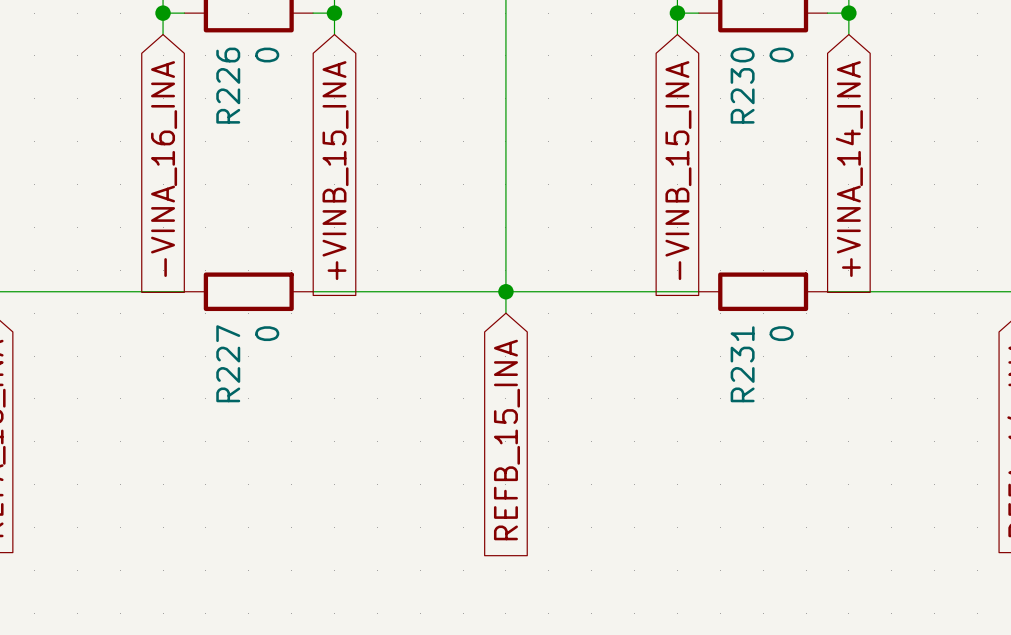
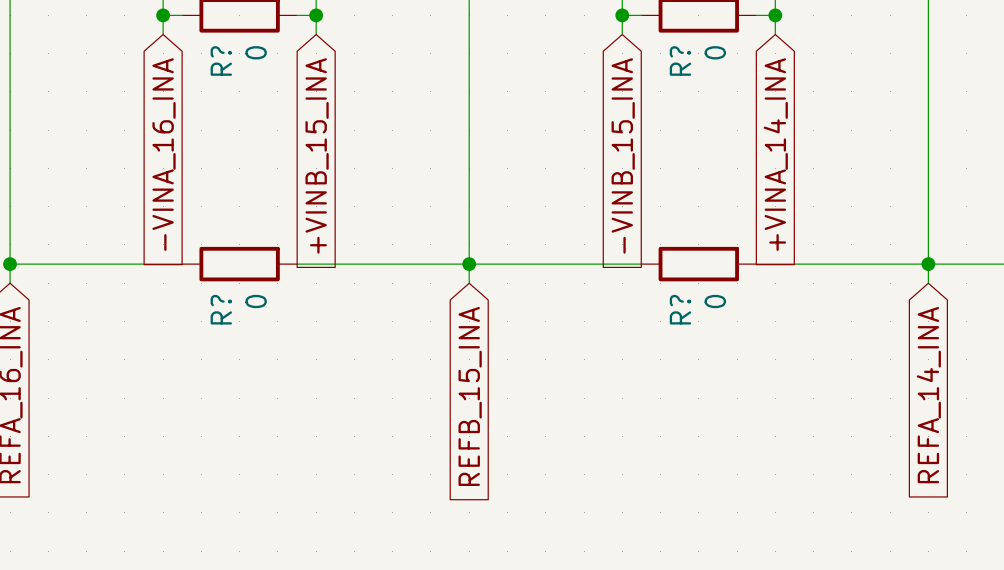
R226 name: R226 (228, 85) -> R? (221, 60)
R230 name: R230 (742, 85) -> R? (680, 60)
R227 name: R227 (228, 363) -> R? (221, 309)
R231 name: R231 (742, 364) -> R? (680, 309)

